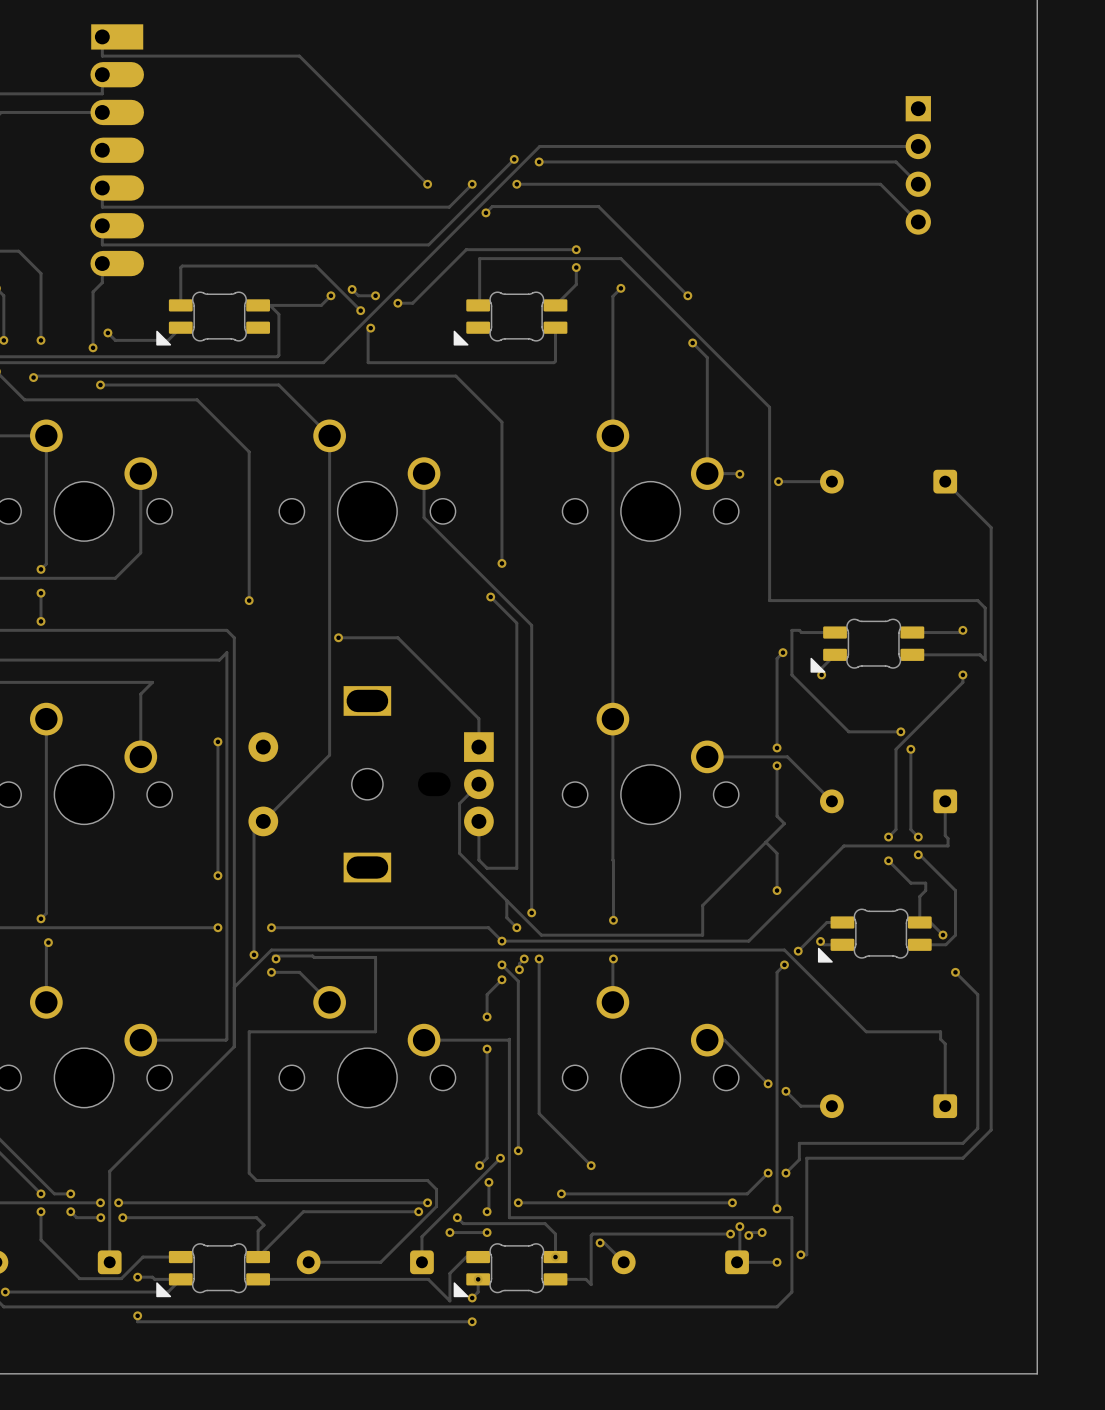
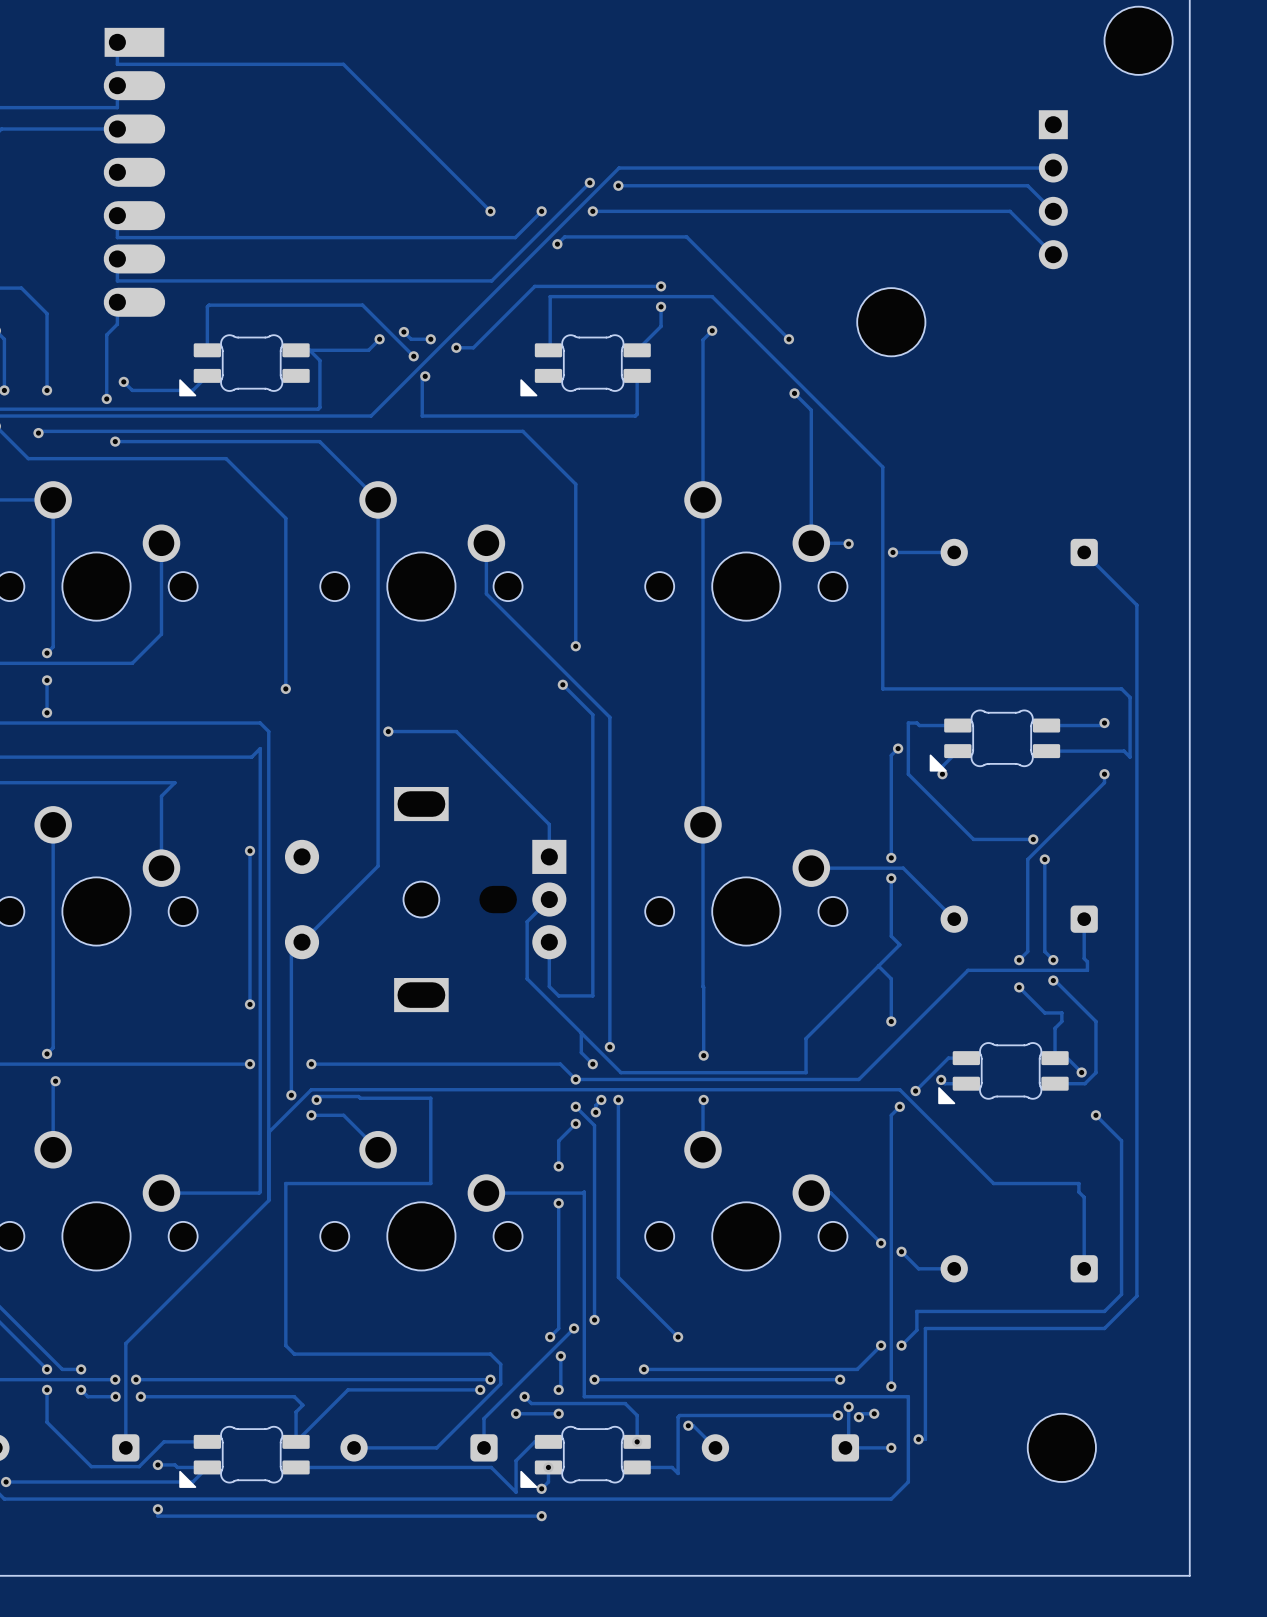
part: none -> (1138, 40)
part: none -> (891, 322)
part: none -> (1061, 1447)

